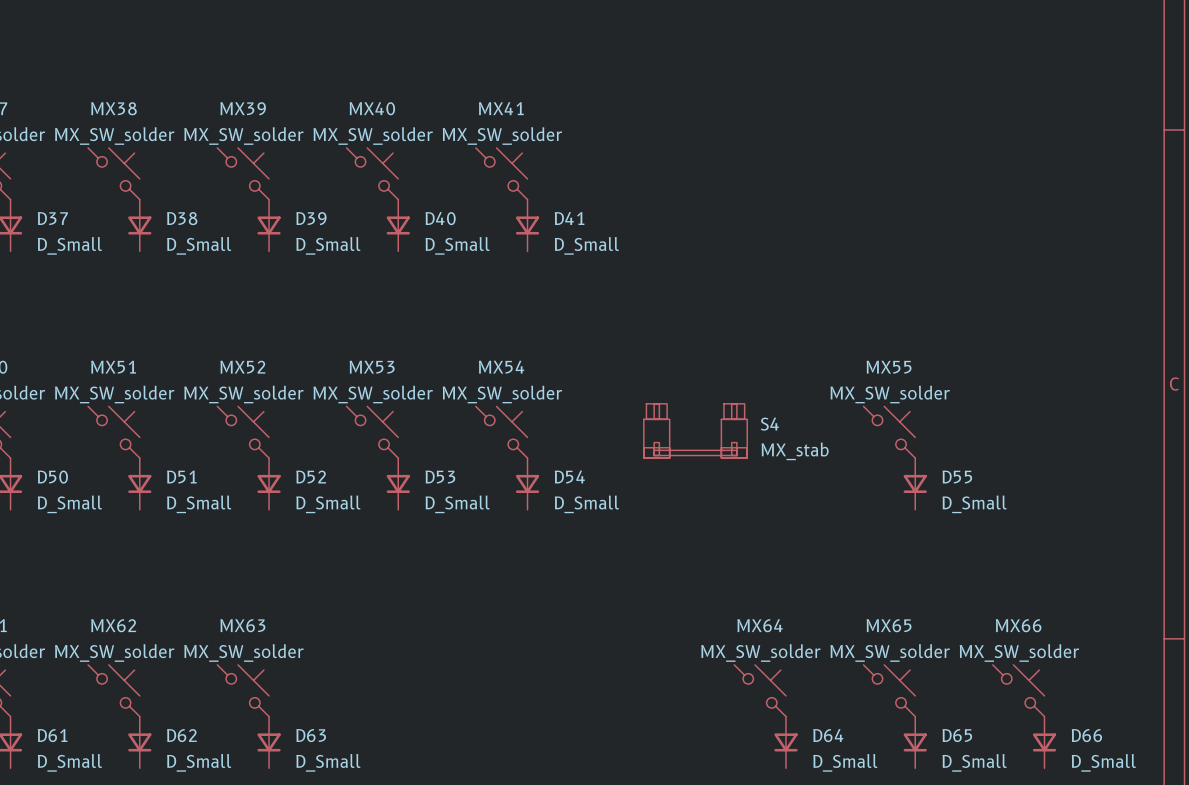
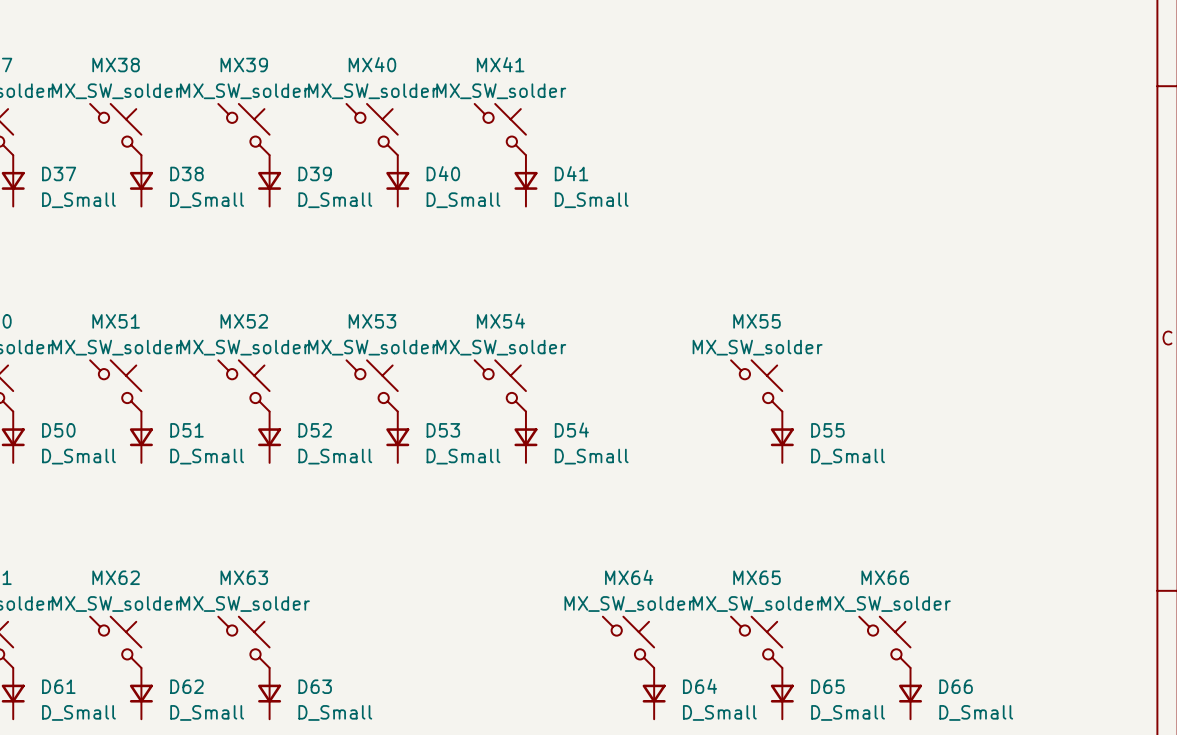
S4: MX_stab (695, 430) -> none
MX55 position: (889, 432) -> (756, 385)
D55 position: (915, 483) -> (782, 437)
MX64 name: MX64 (760, 625) -> MX65 (756, 577)
MX65 name: MX65 (889, 625) -> MX66 (885, 577)
MX64: none -> MX_SW_solder (628, 642)
MX66: MX_SW_solder (1018, 690) -> none
D64 name: D64 (828, 735) -> D65 (827, 686)
D65 name: D65 (957, 735) -> D66 (956, 686)
D64: none -> D_Small (654, 693)
D66: D_Small (1044, 742) -> none

